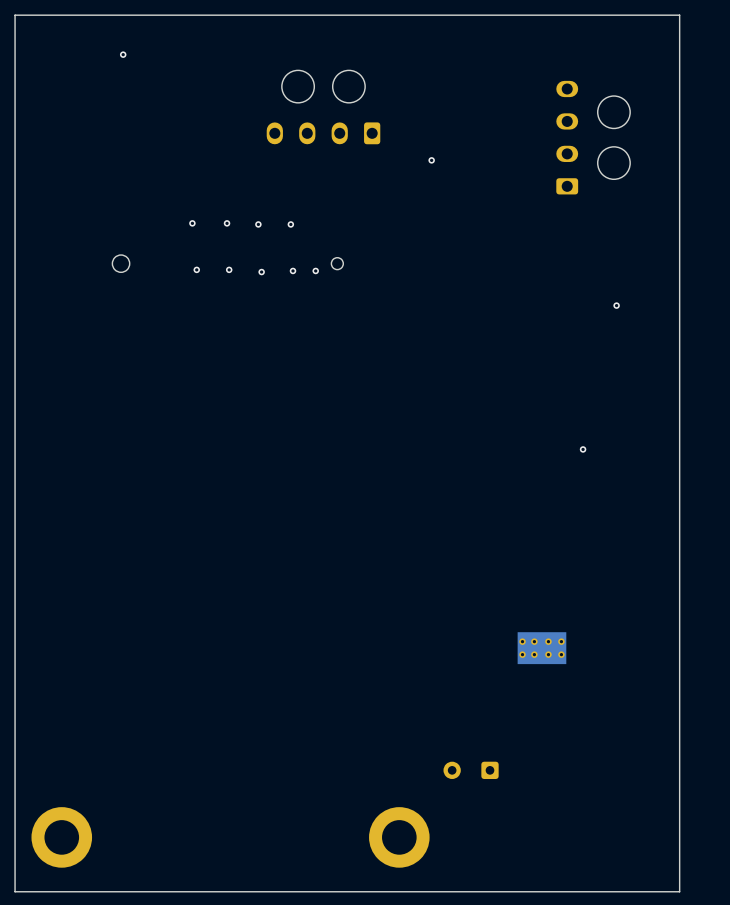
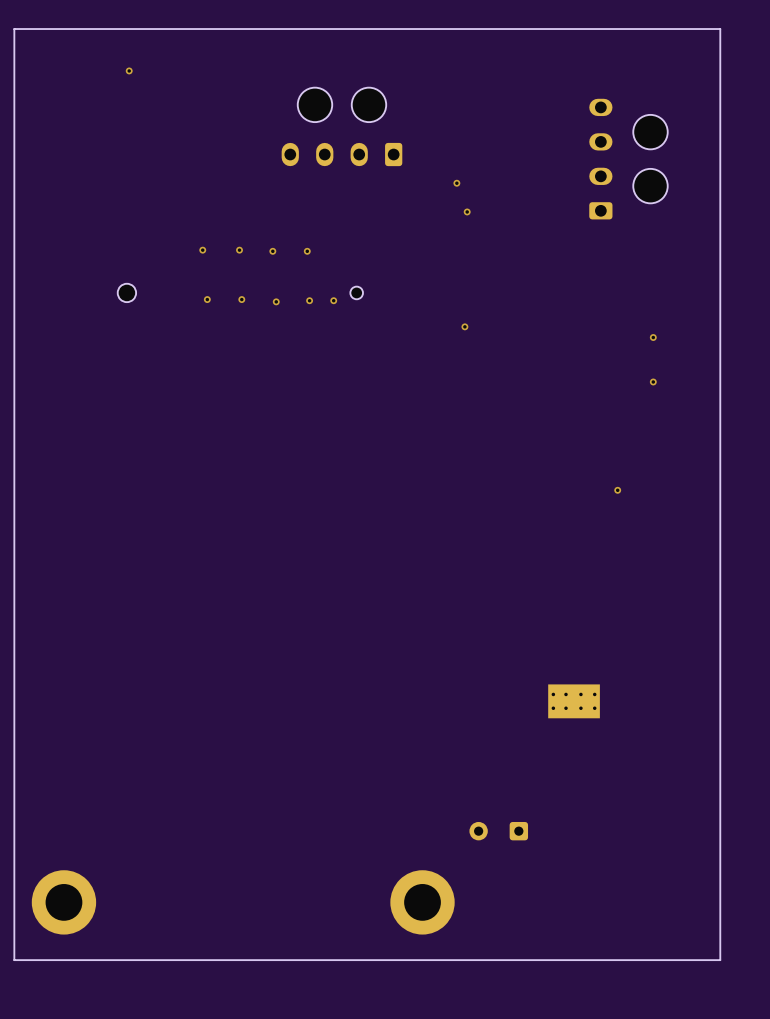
via: none -> (467, 211)
via: none -> (464, 326)
via: none -> (653, 381)

